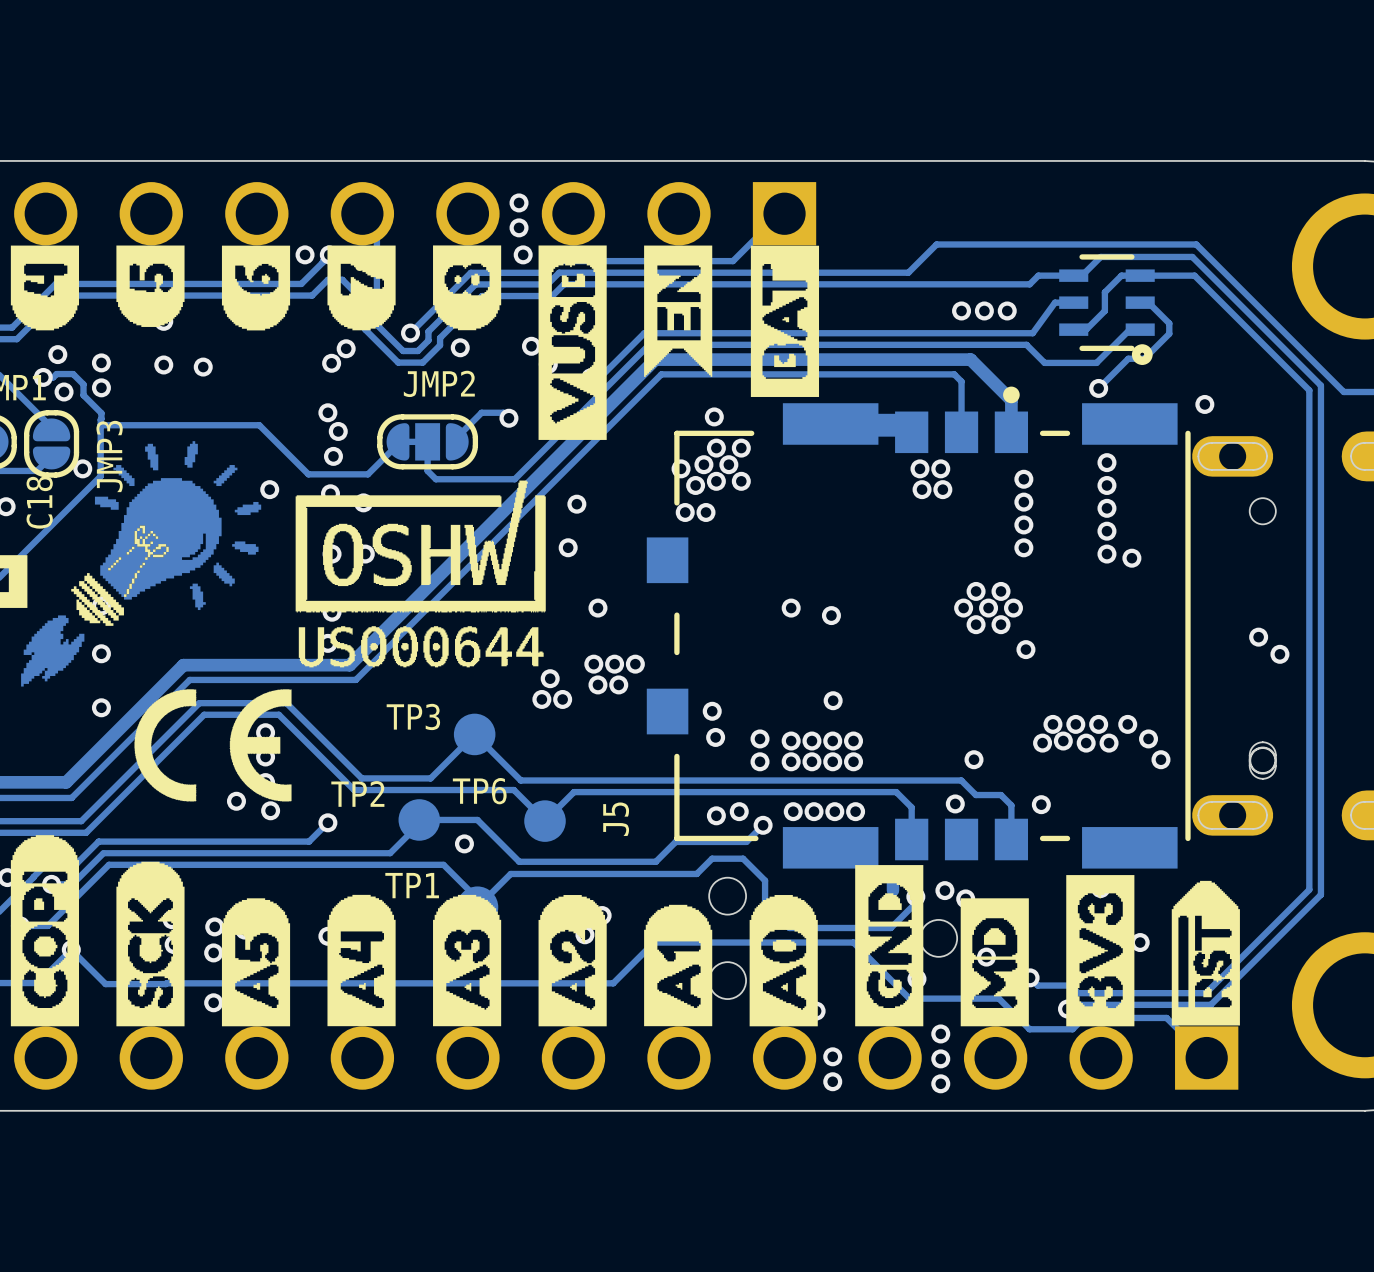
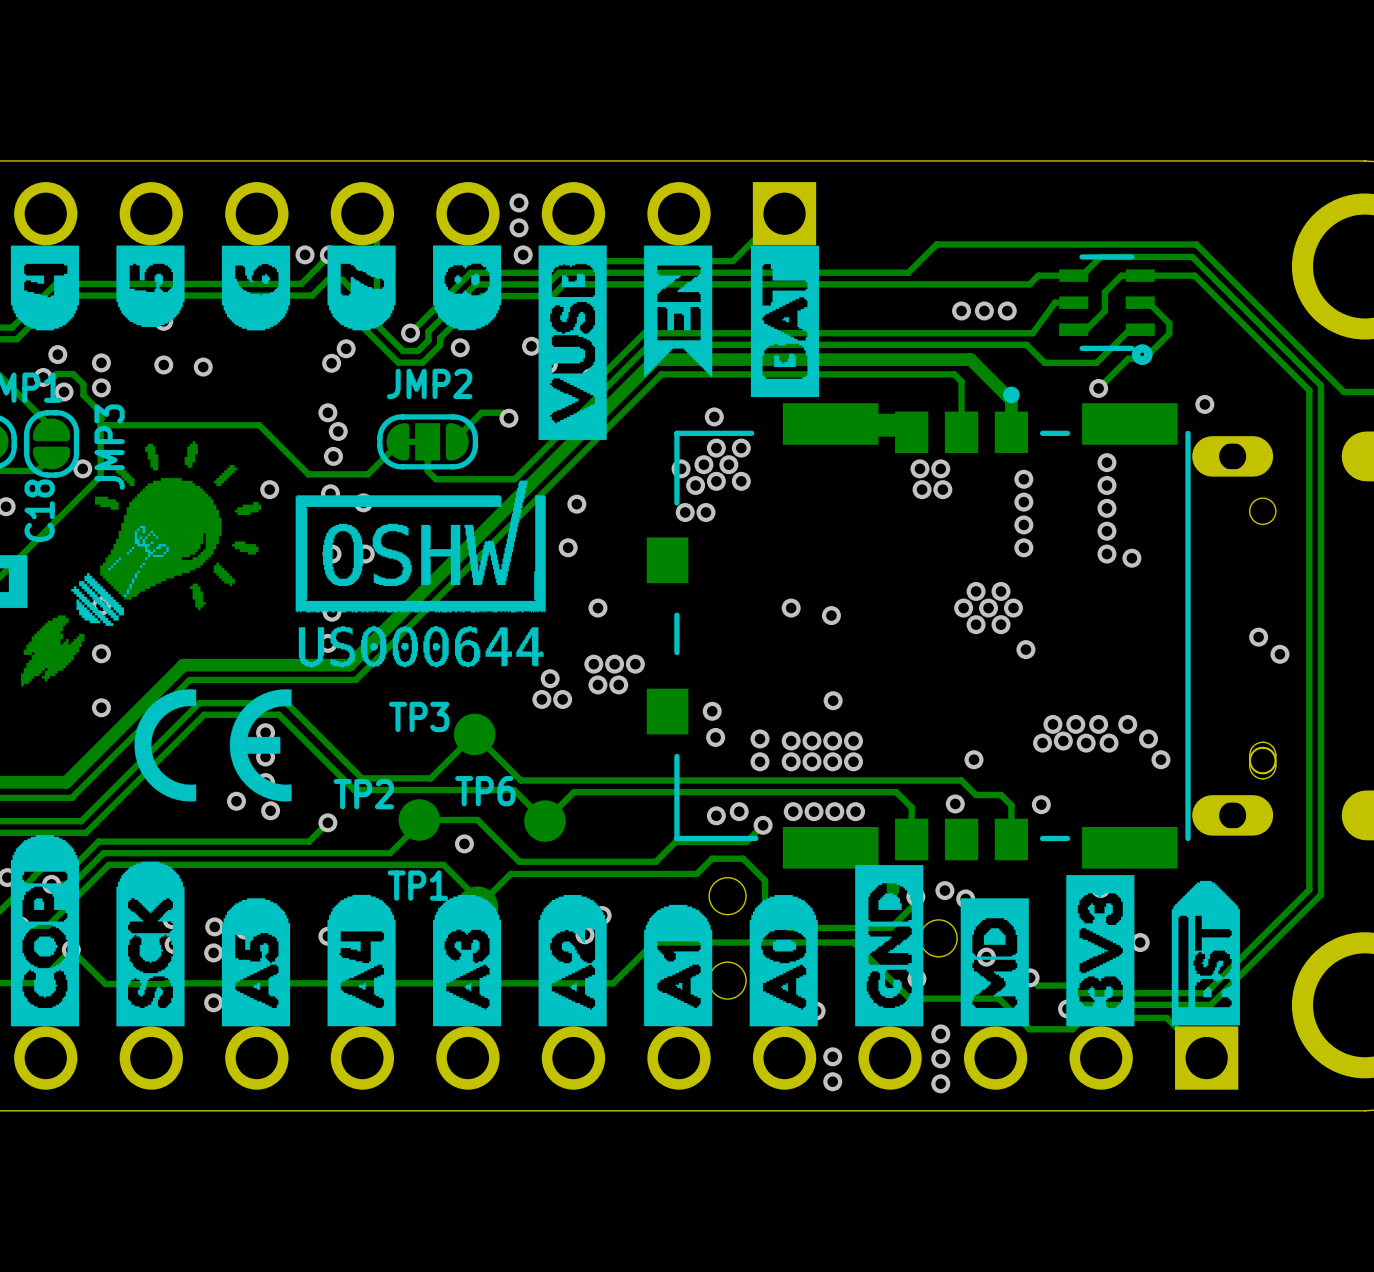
J5 name: J5 (616, 819) -> none

